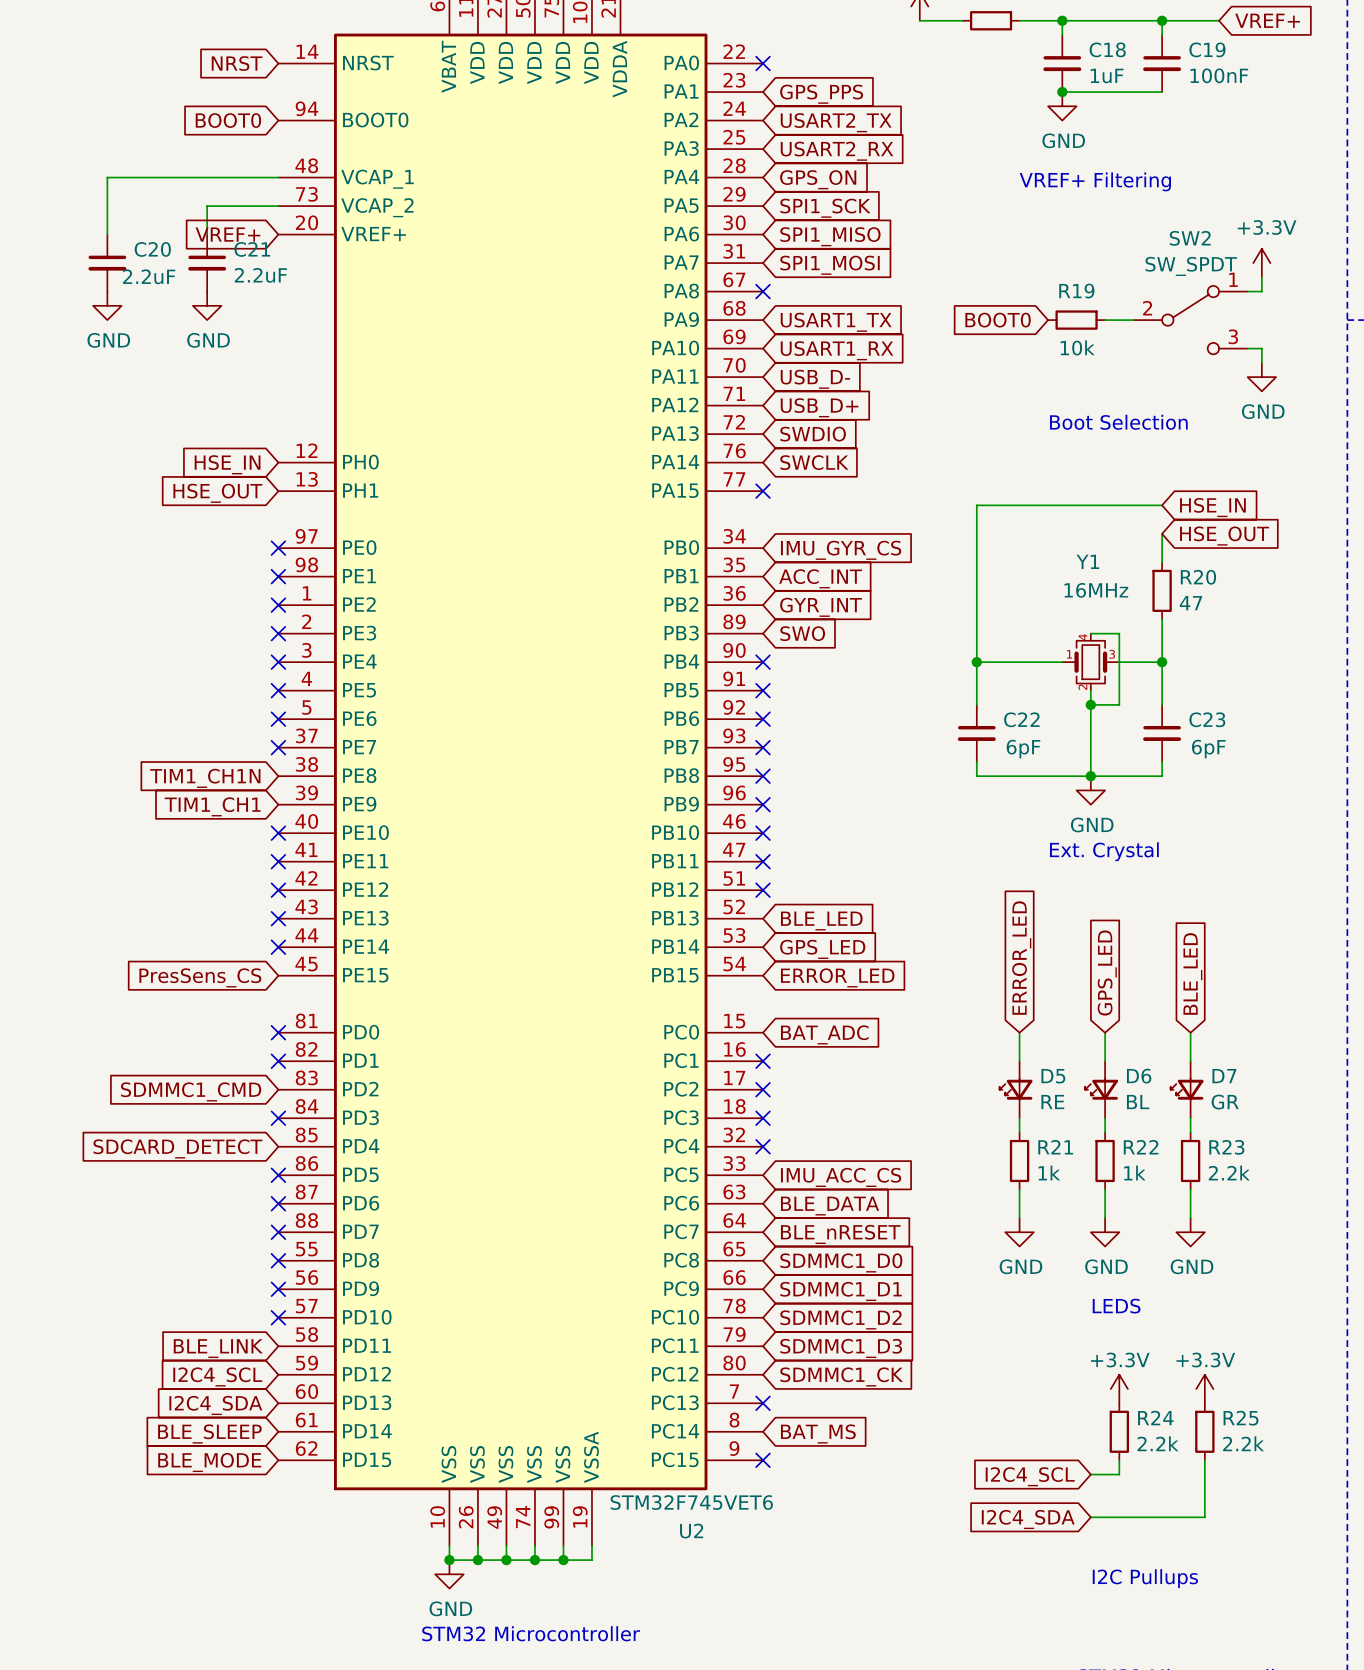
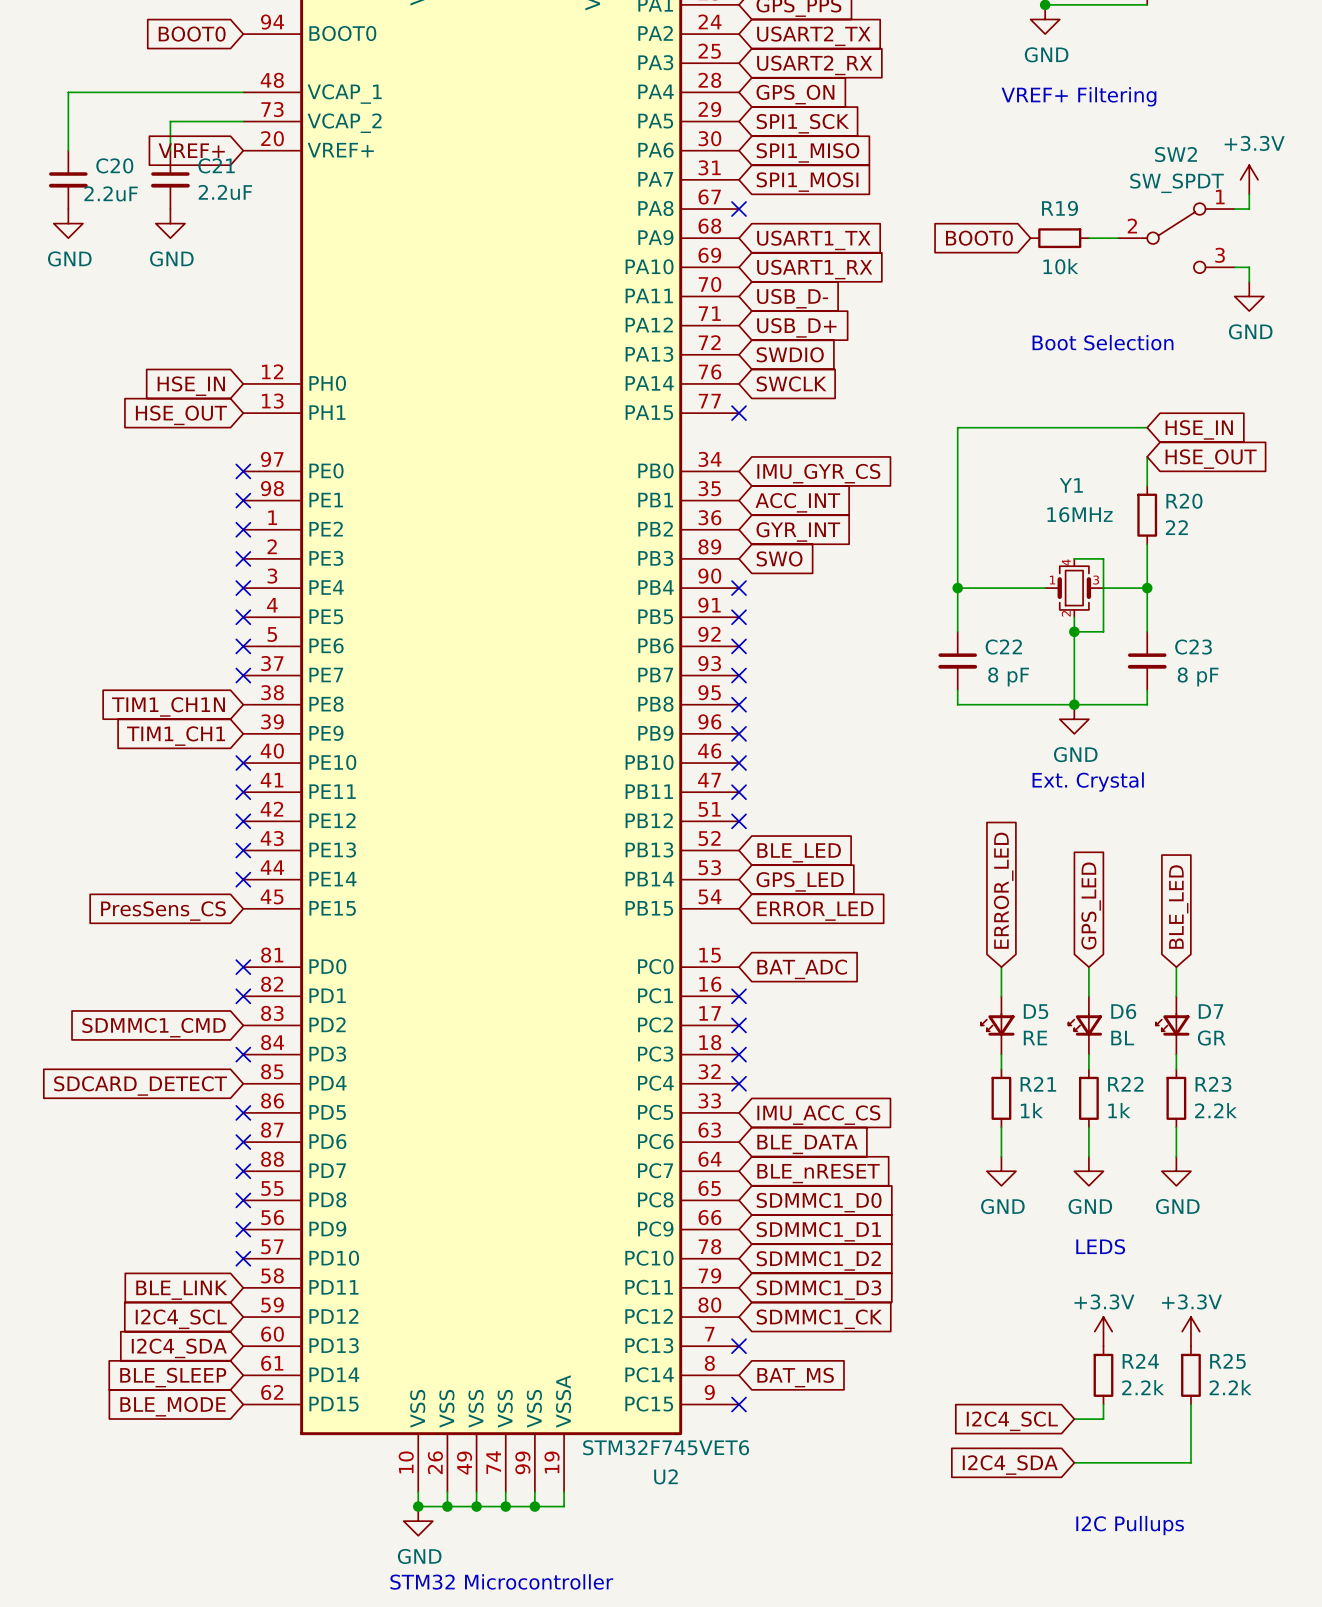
R20 value: 47 (1190, 603) -> 22 (1176, 527)
C22 value: 6pF (1023, 749) -> 8 pF (1008, 676)
C23 value: 6pF (1208, 749) -> 8 pF (1198, 676)

